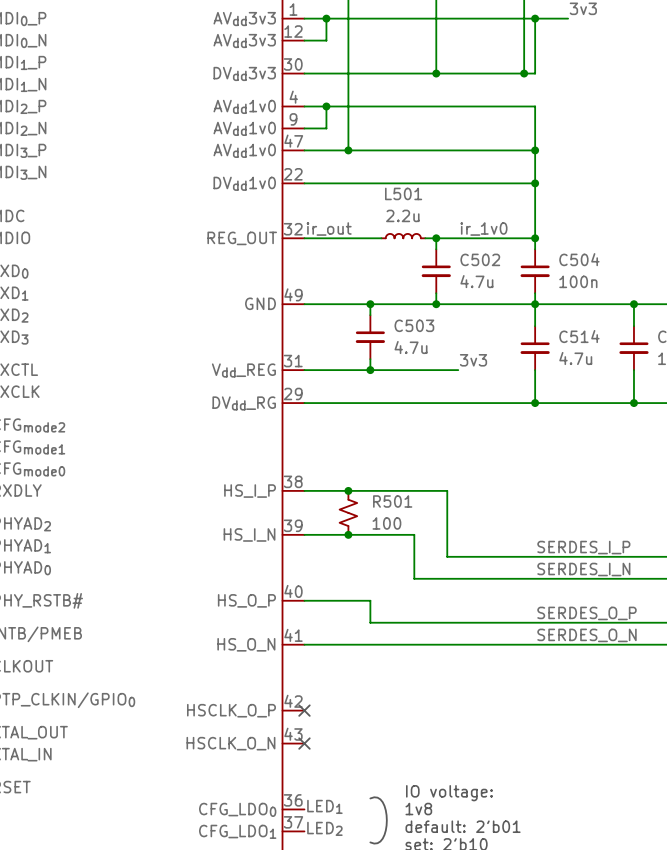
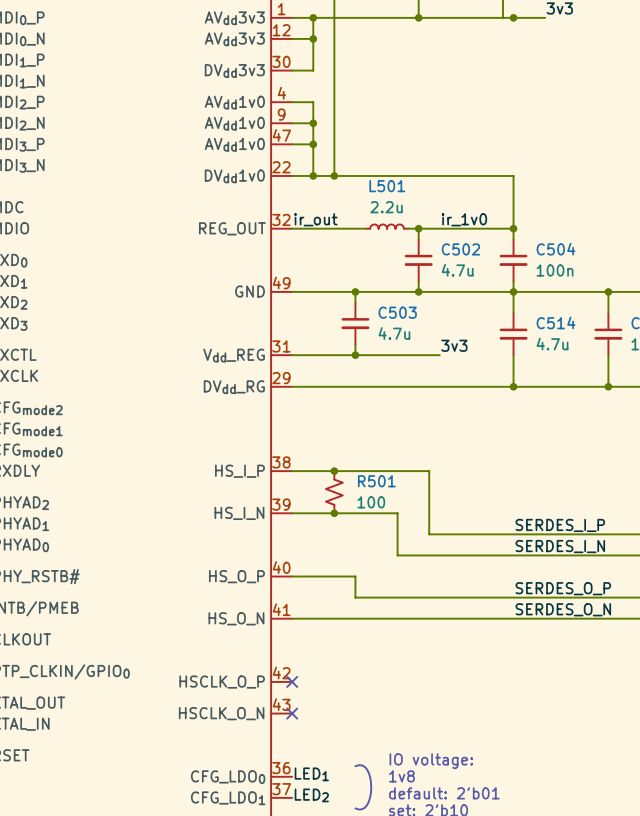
wire: (436, 18) (436, 73) -> (313, 123) (313, 175)
junction: none -> (418, 17)
wire: (524, 18) (524, 73) -> none
wire: (535, 18) (535, 73) (326, 73) -> (313, 38) (313, 70)
junction: none -> (313, 38)
junction: (436, 73) -> none
junction: (524, 73) -> none
wire: (326, 106) (535, 106) (535, 183) -> none
junction: (326, 106) -> none
junction: none -> (313, 123)
wire: (326, 150) (535, 150) -> none
junction: none -> (313, 144)
wire: none -> (334, 144) (334, 175)
junction: (348, 150) -> none
junction: (535, 150) -> none
junction: none -> (313, 175)
junction: none -> (334, 175)
junction: (535, 183) -> none

